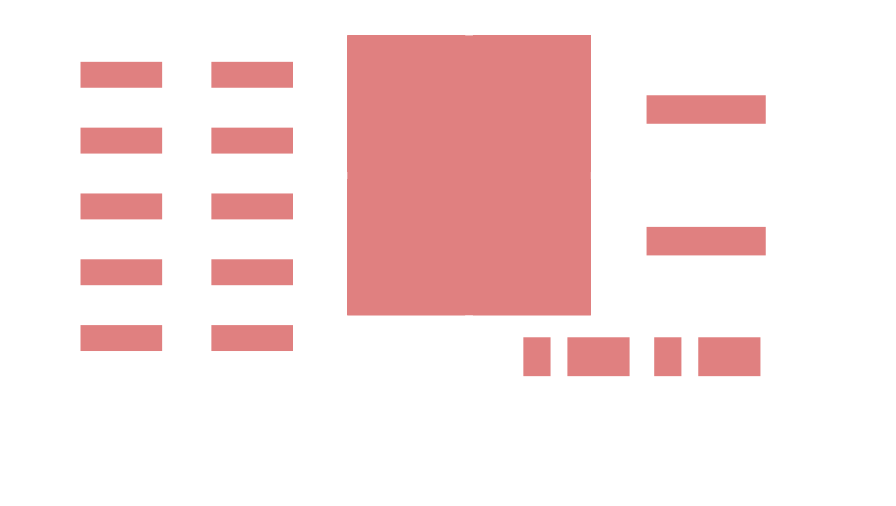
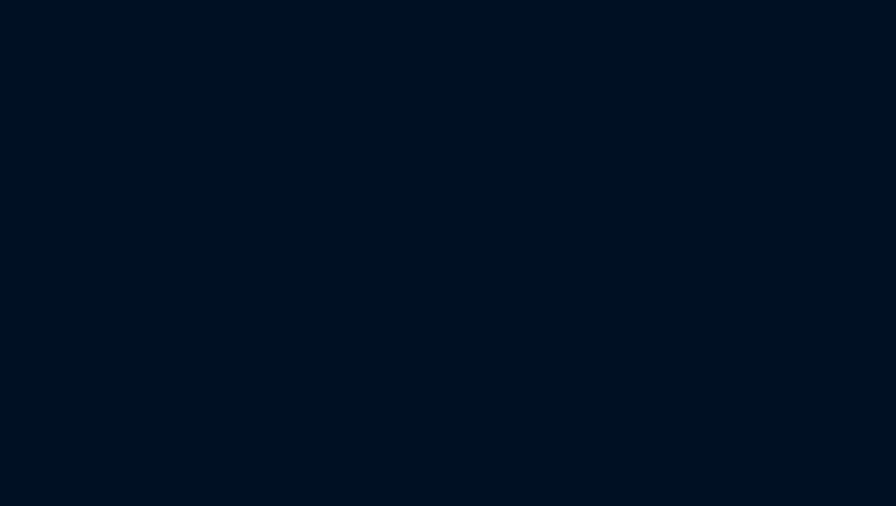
part: (556, 175) -> none
part: (186, 206) -> none
part: (576, 356) -> none
part: (707, 356) -> none

